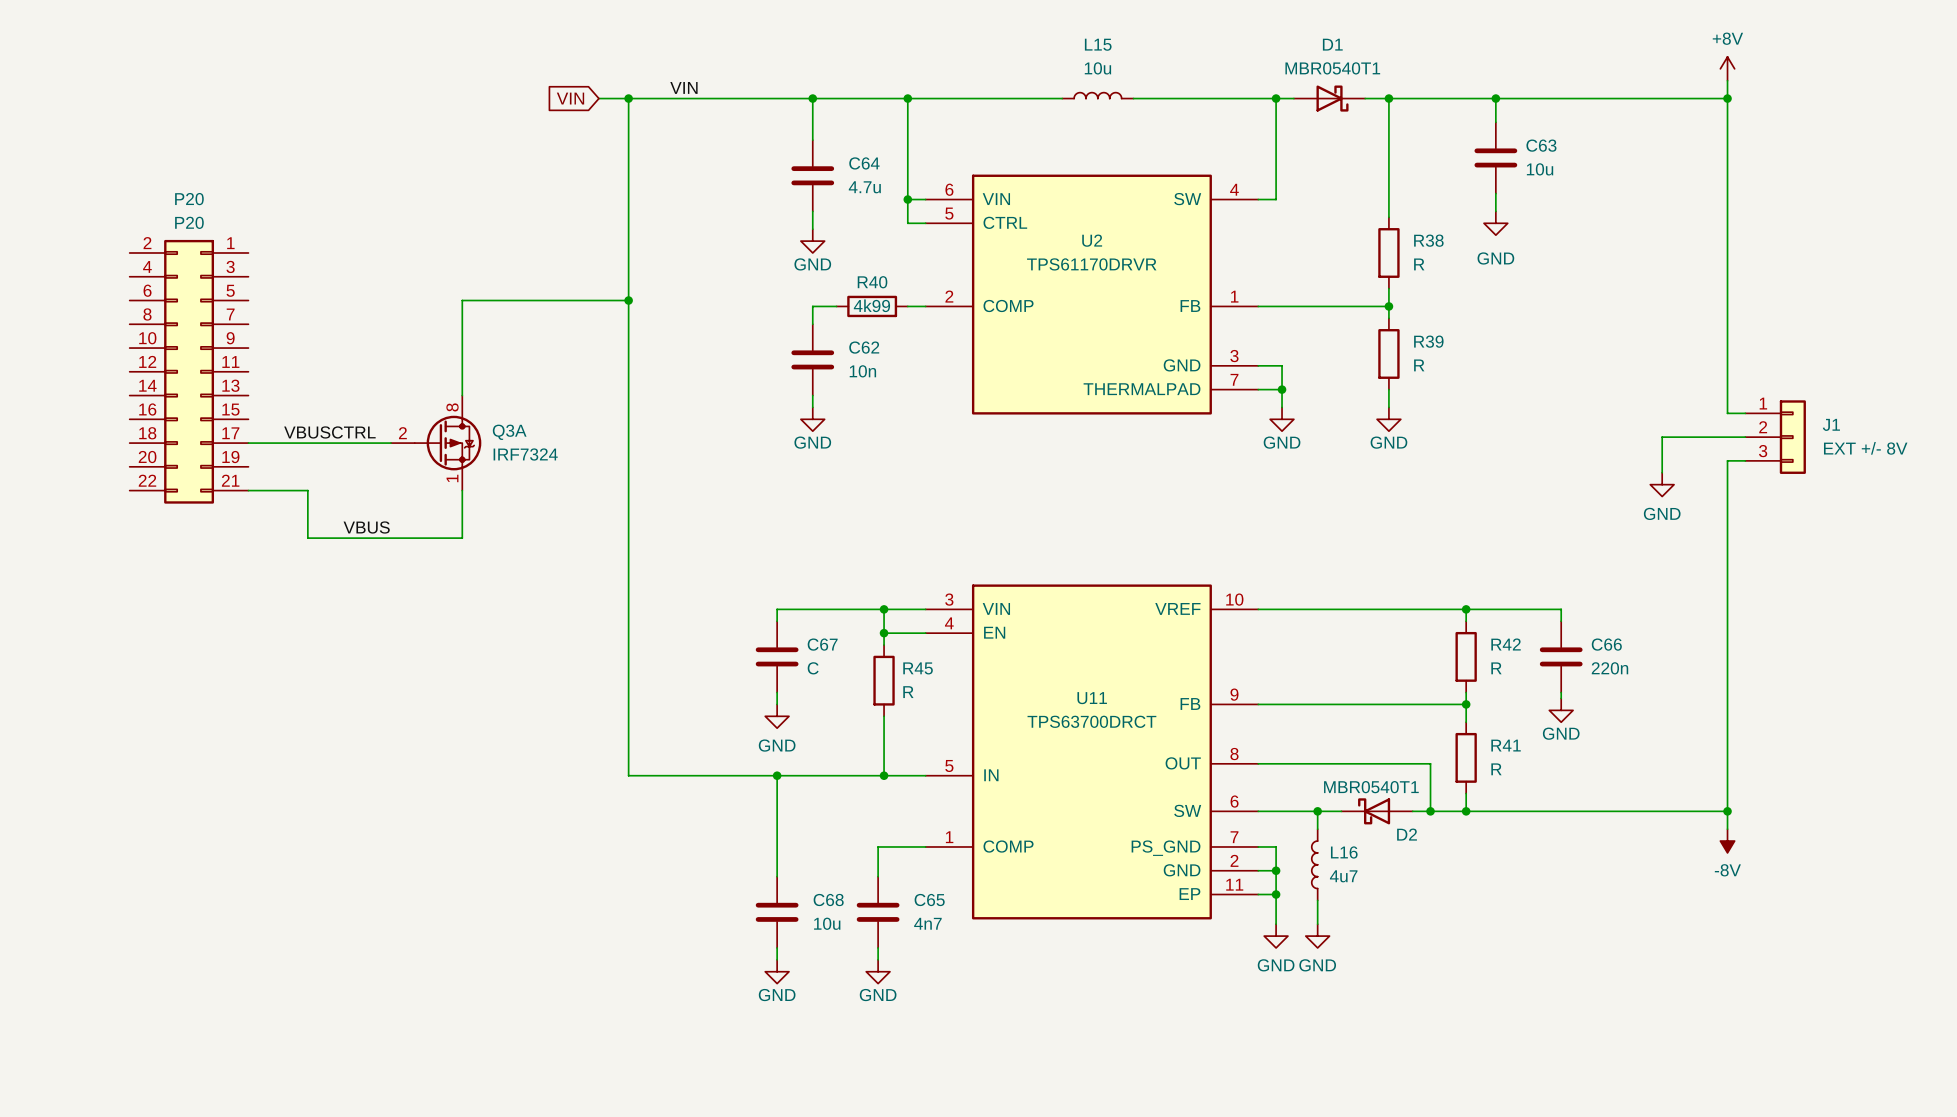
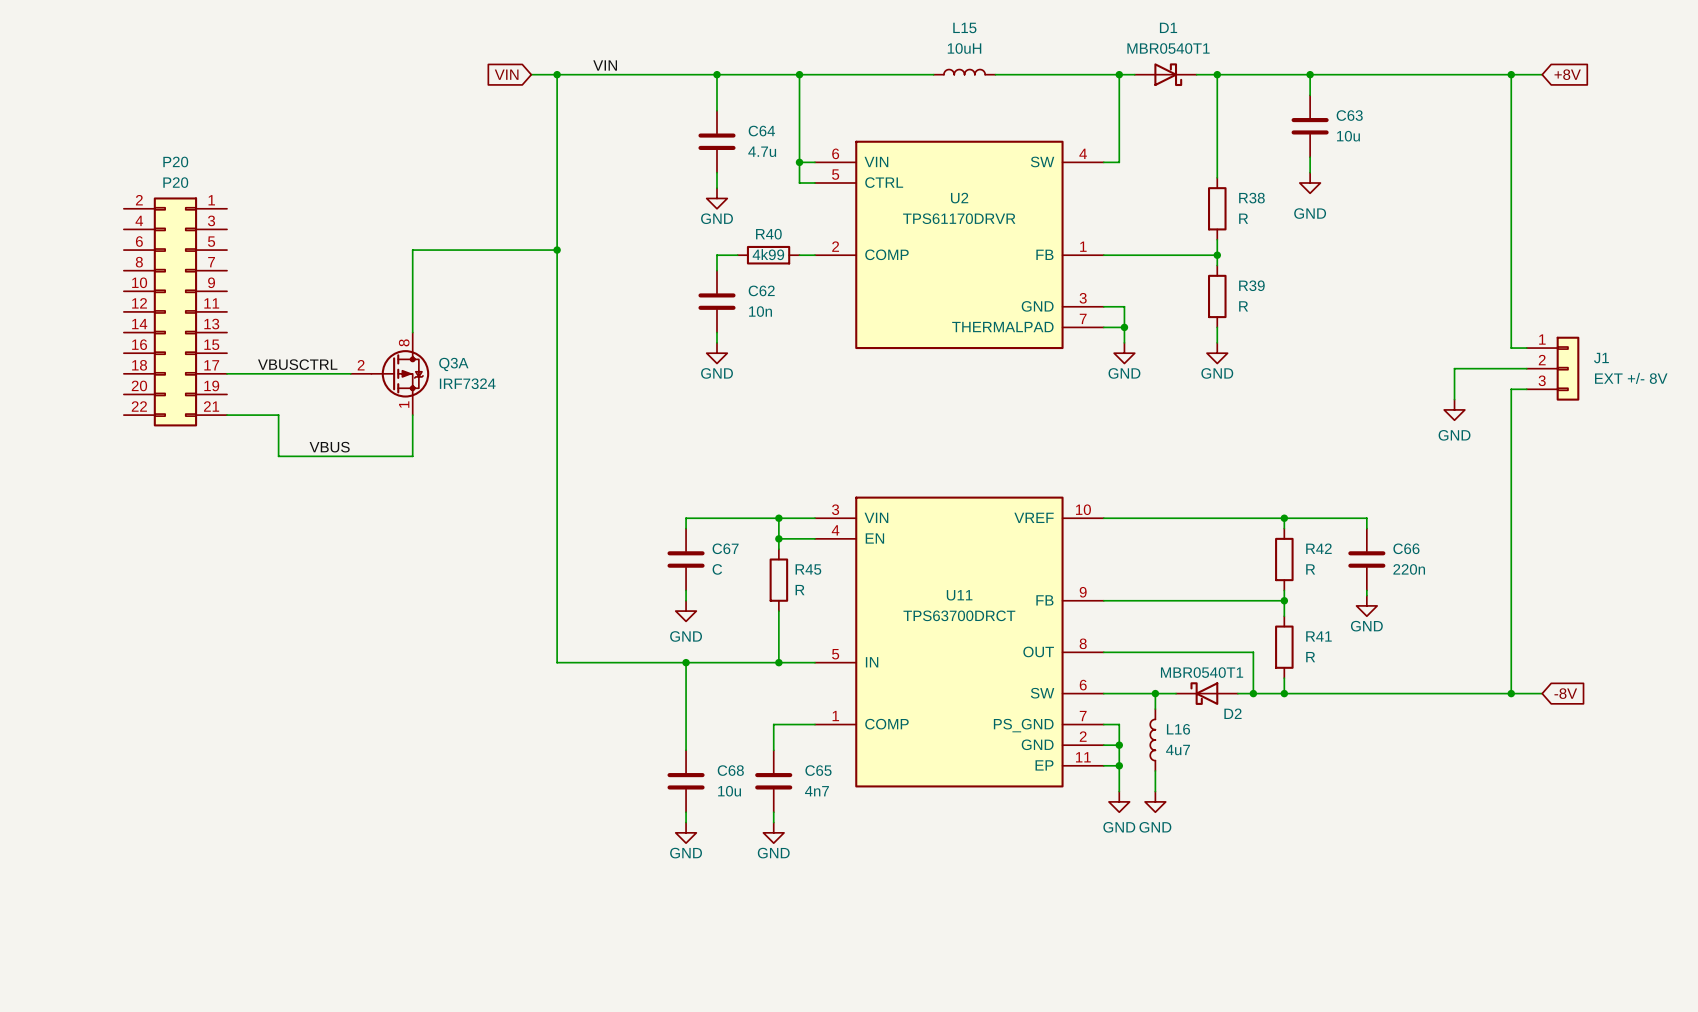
L15 value: 10u (1097, 68) -> 10uH (964, 48)
power symbol: +8V (1727, 68) -> none
wire: (1727, 80) (1727, 98) -> (1542, 74) (1511, 74)
global label: none -> +8V (1567, 74)
wire: (1727, 811) (1727, 829) -> (1511, 693) (1542, 693)
global label: none -> -8V (1565, 693)
power symbol: -8V (1727, 841) -> none

